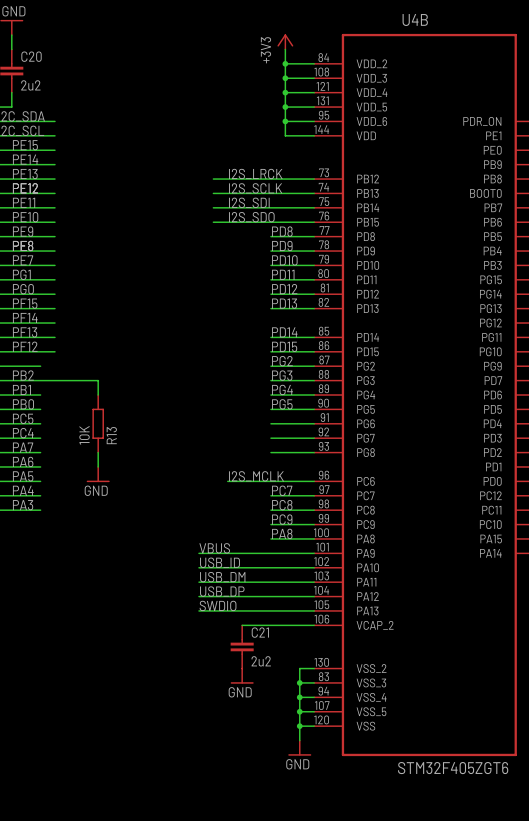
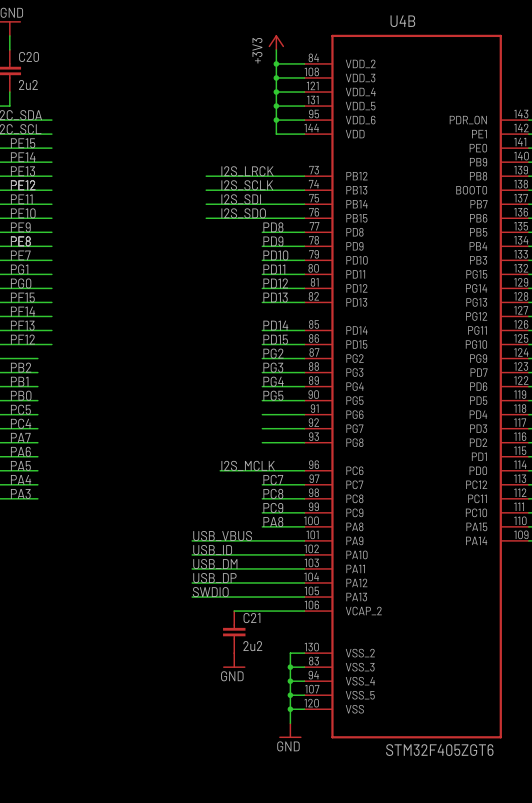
wire: (40, 380) (98, 380) (98, 395) -> none
R13: 10K (98, 423) -> none
wire: (98, 452) (98, 466) -> none
power symbol: GND (98, 474) -> none
label: VBUS (214, 548) -> USB_VBUS (222, 535)

